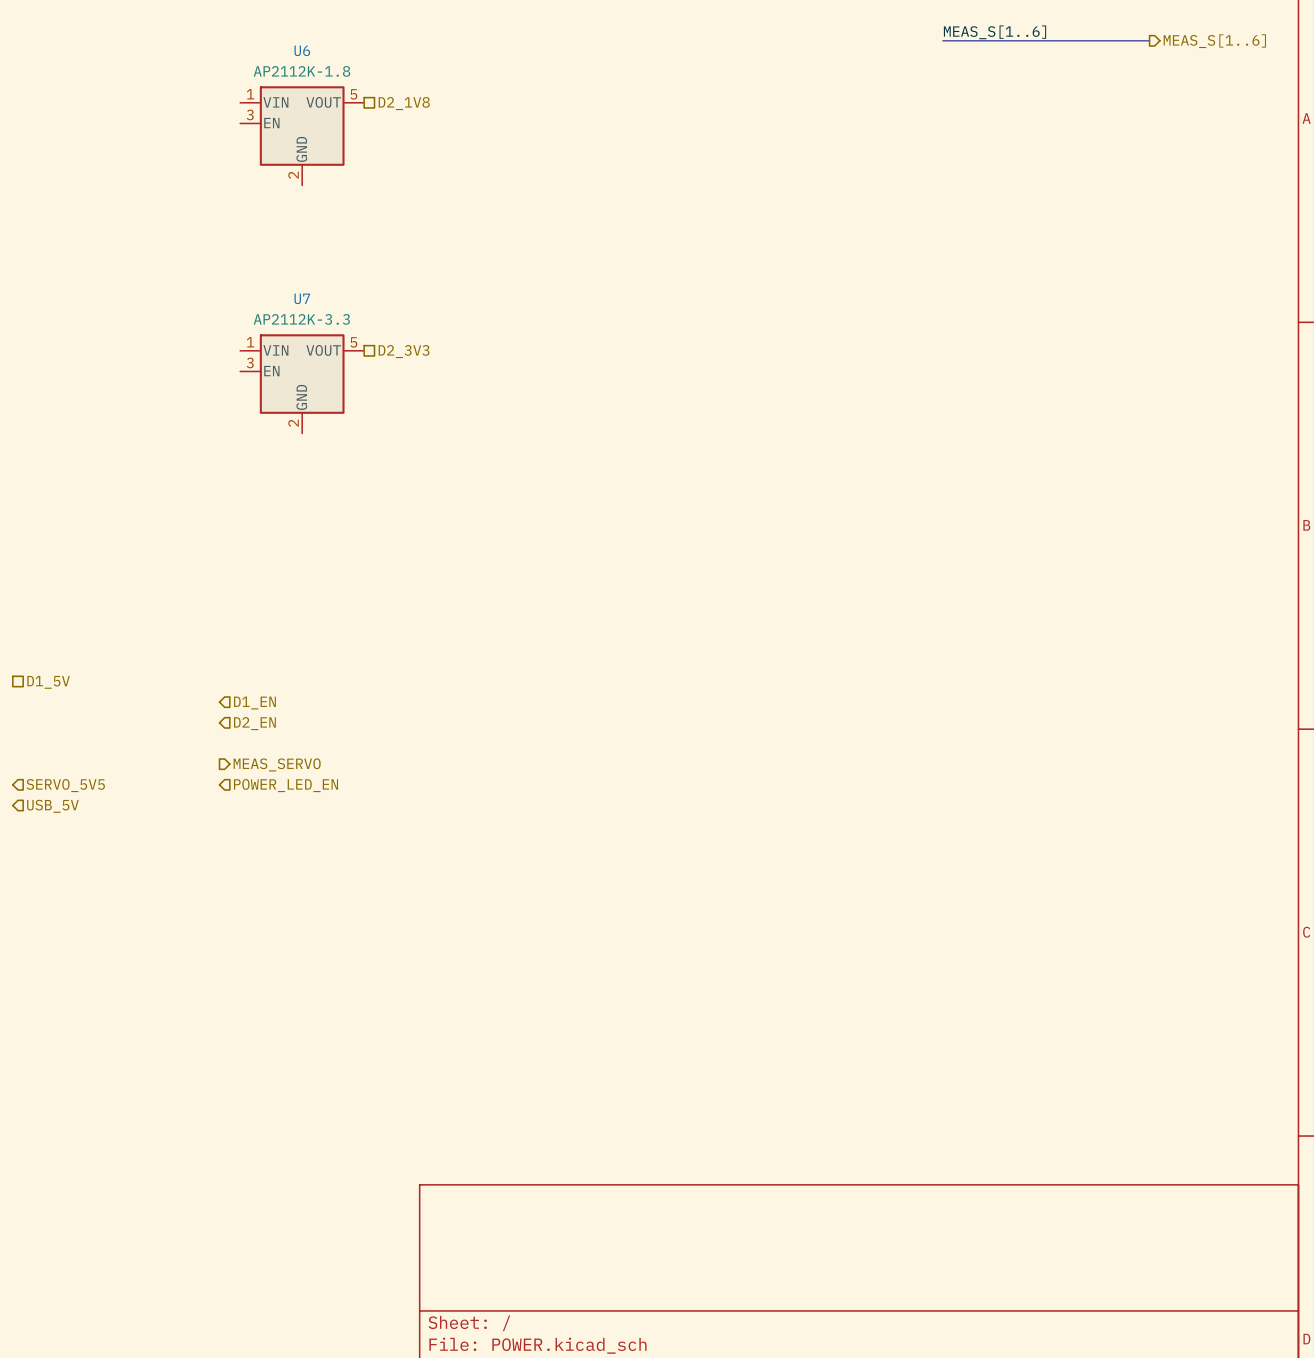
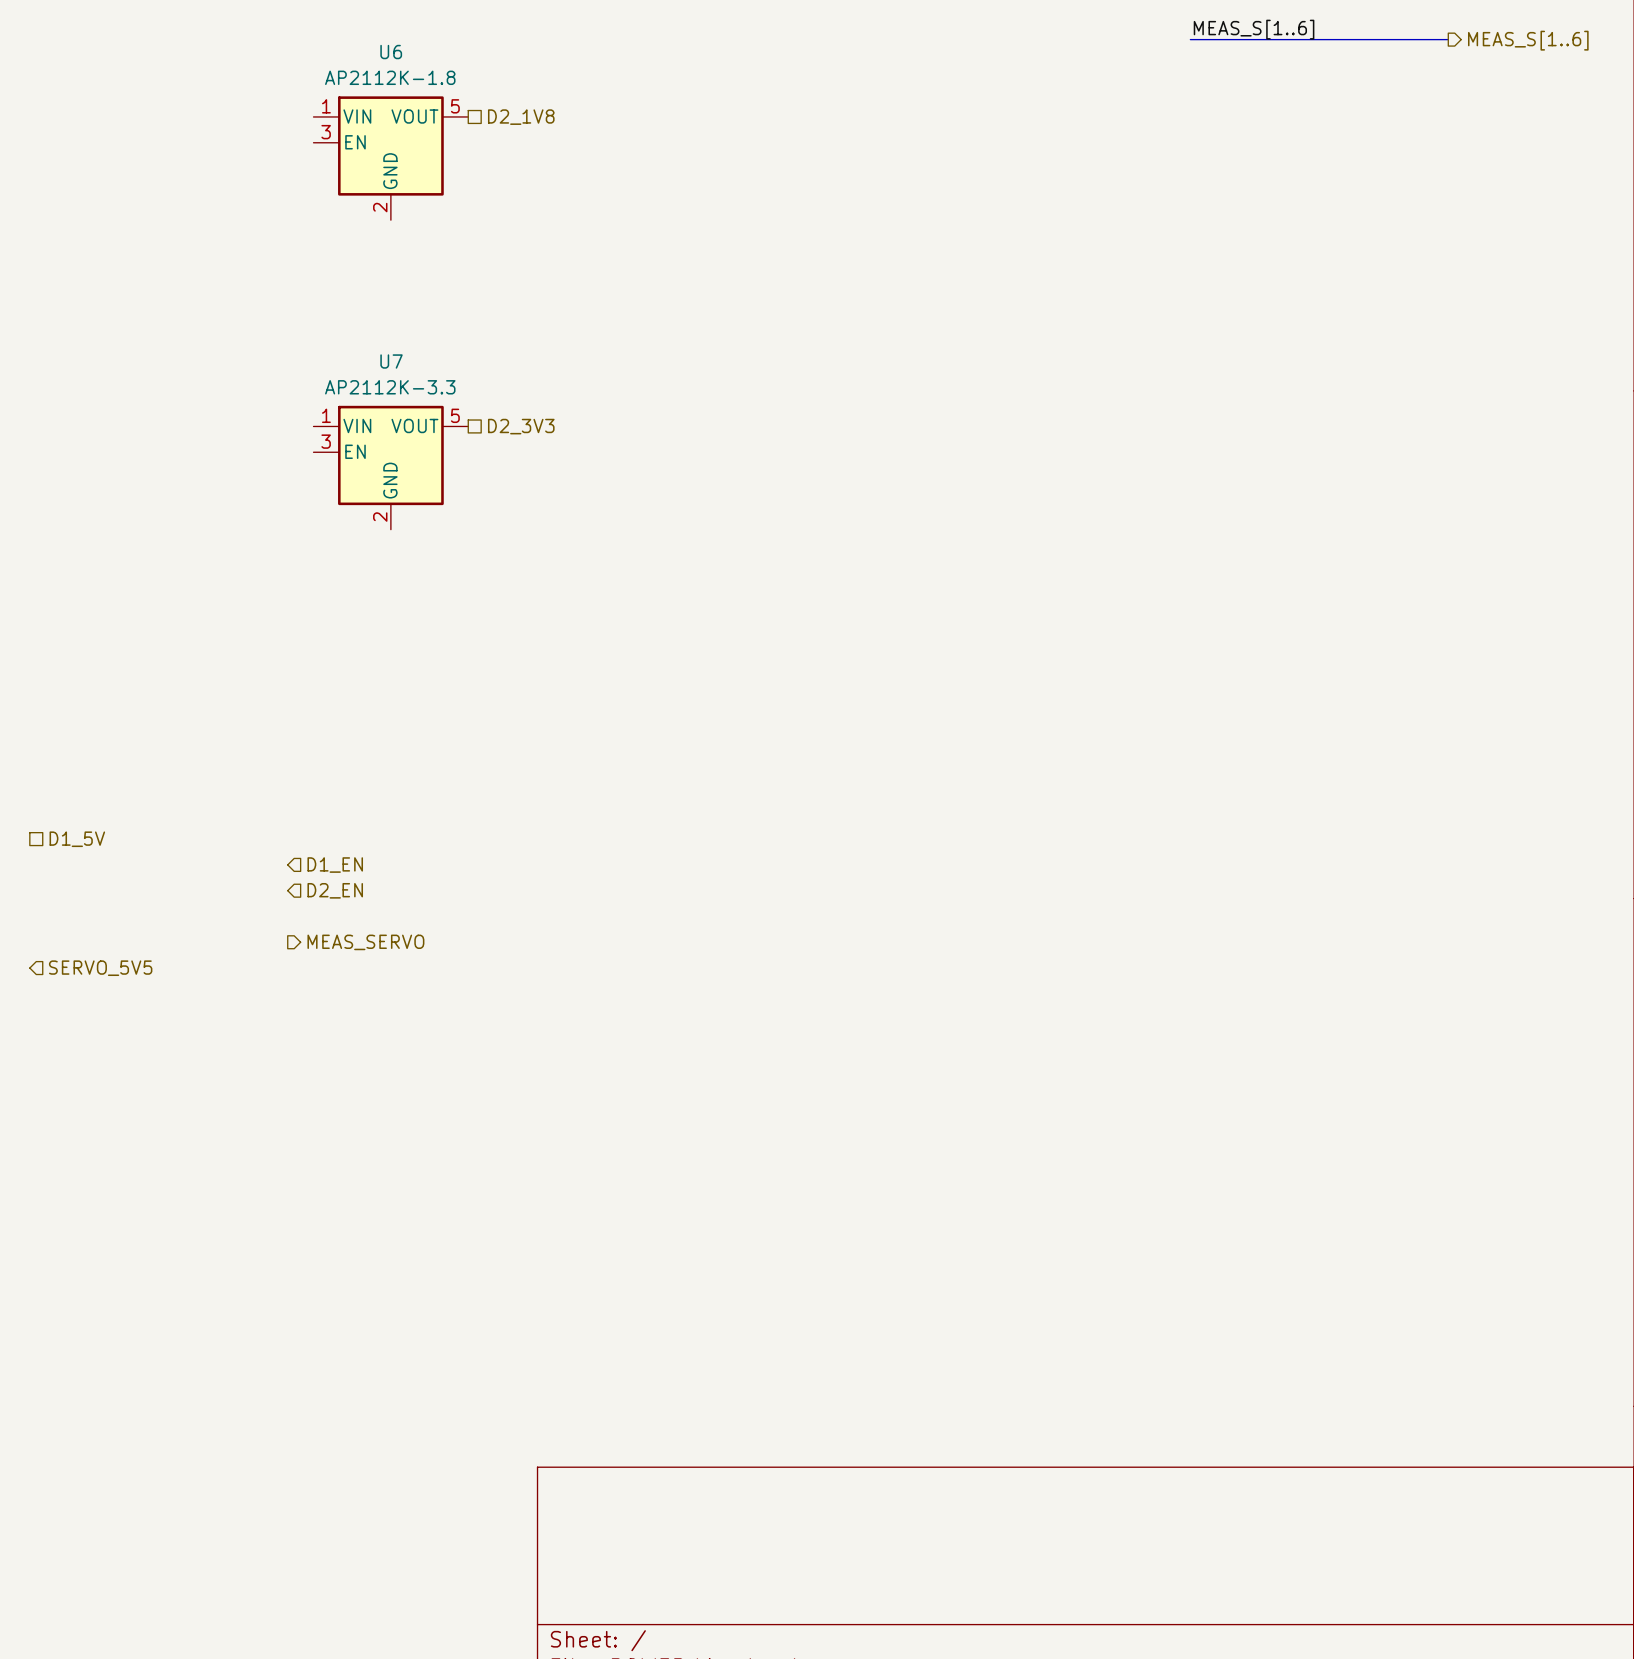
hierarchical label: POWER_LED_EN (286, 785) -> none
hierarchical label: USB_5V (52, 806) -> none

